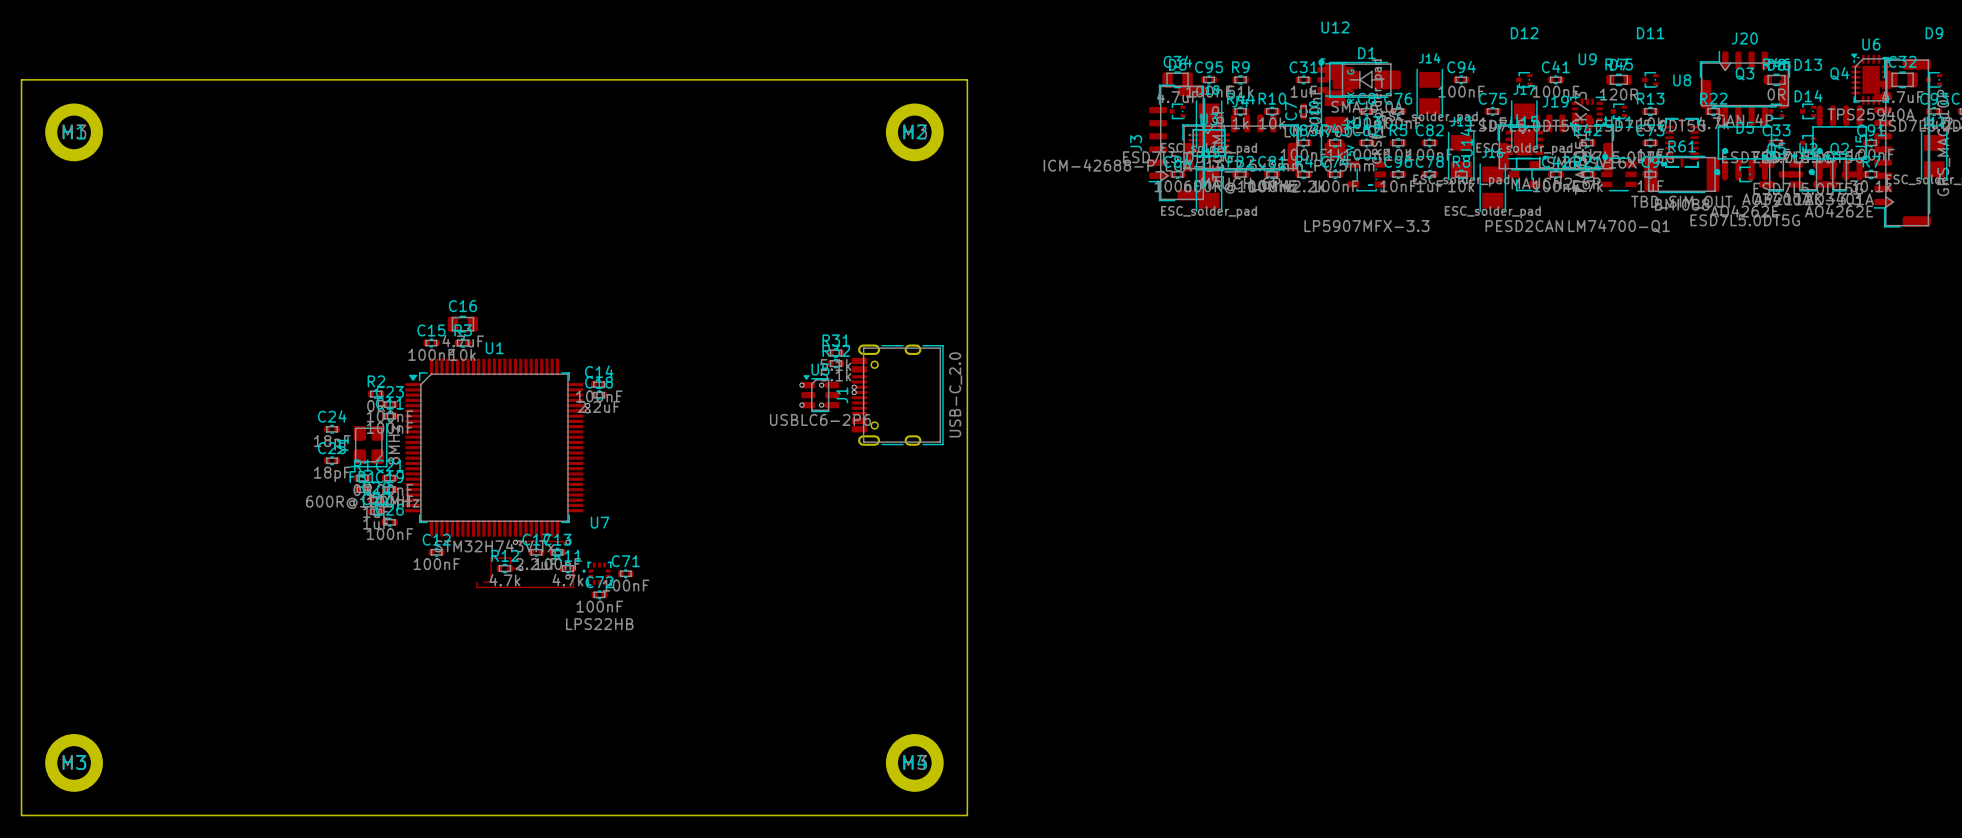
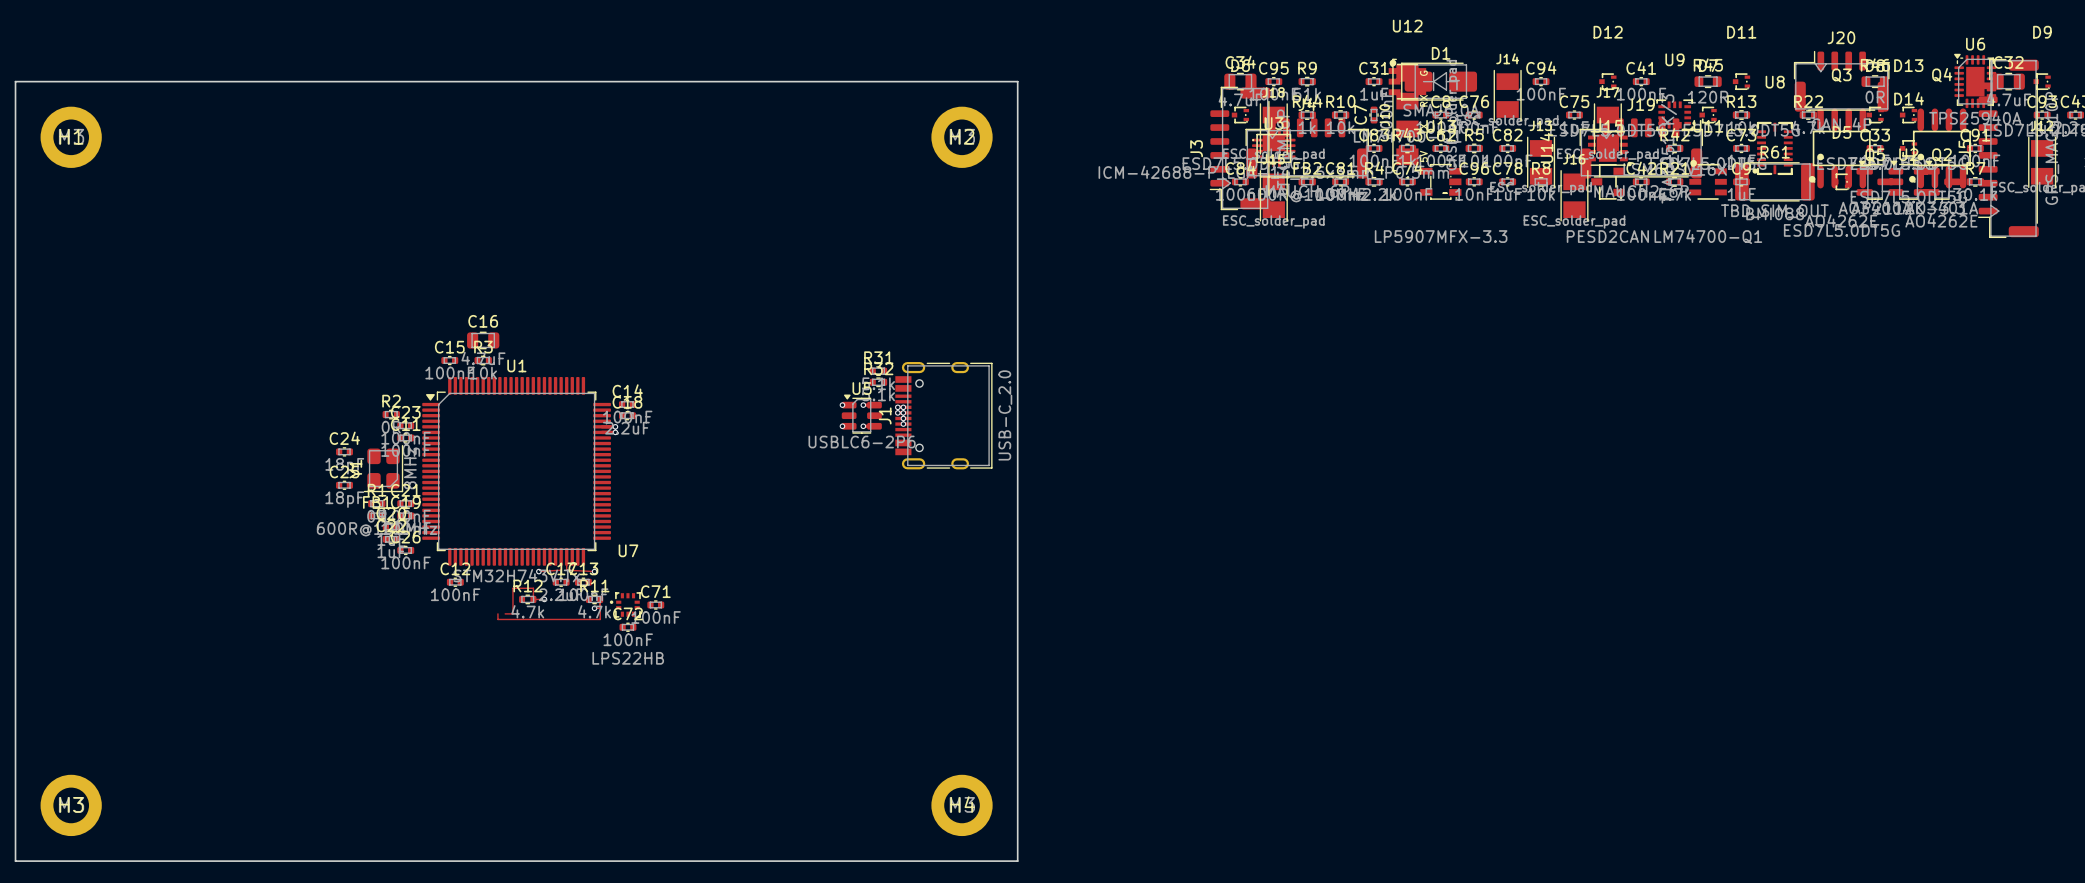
via: none -> (903, 407)
via: none -> (903, 412)
via: none -> (903, 418)
via: none -> (903, 424)

